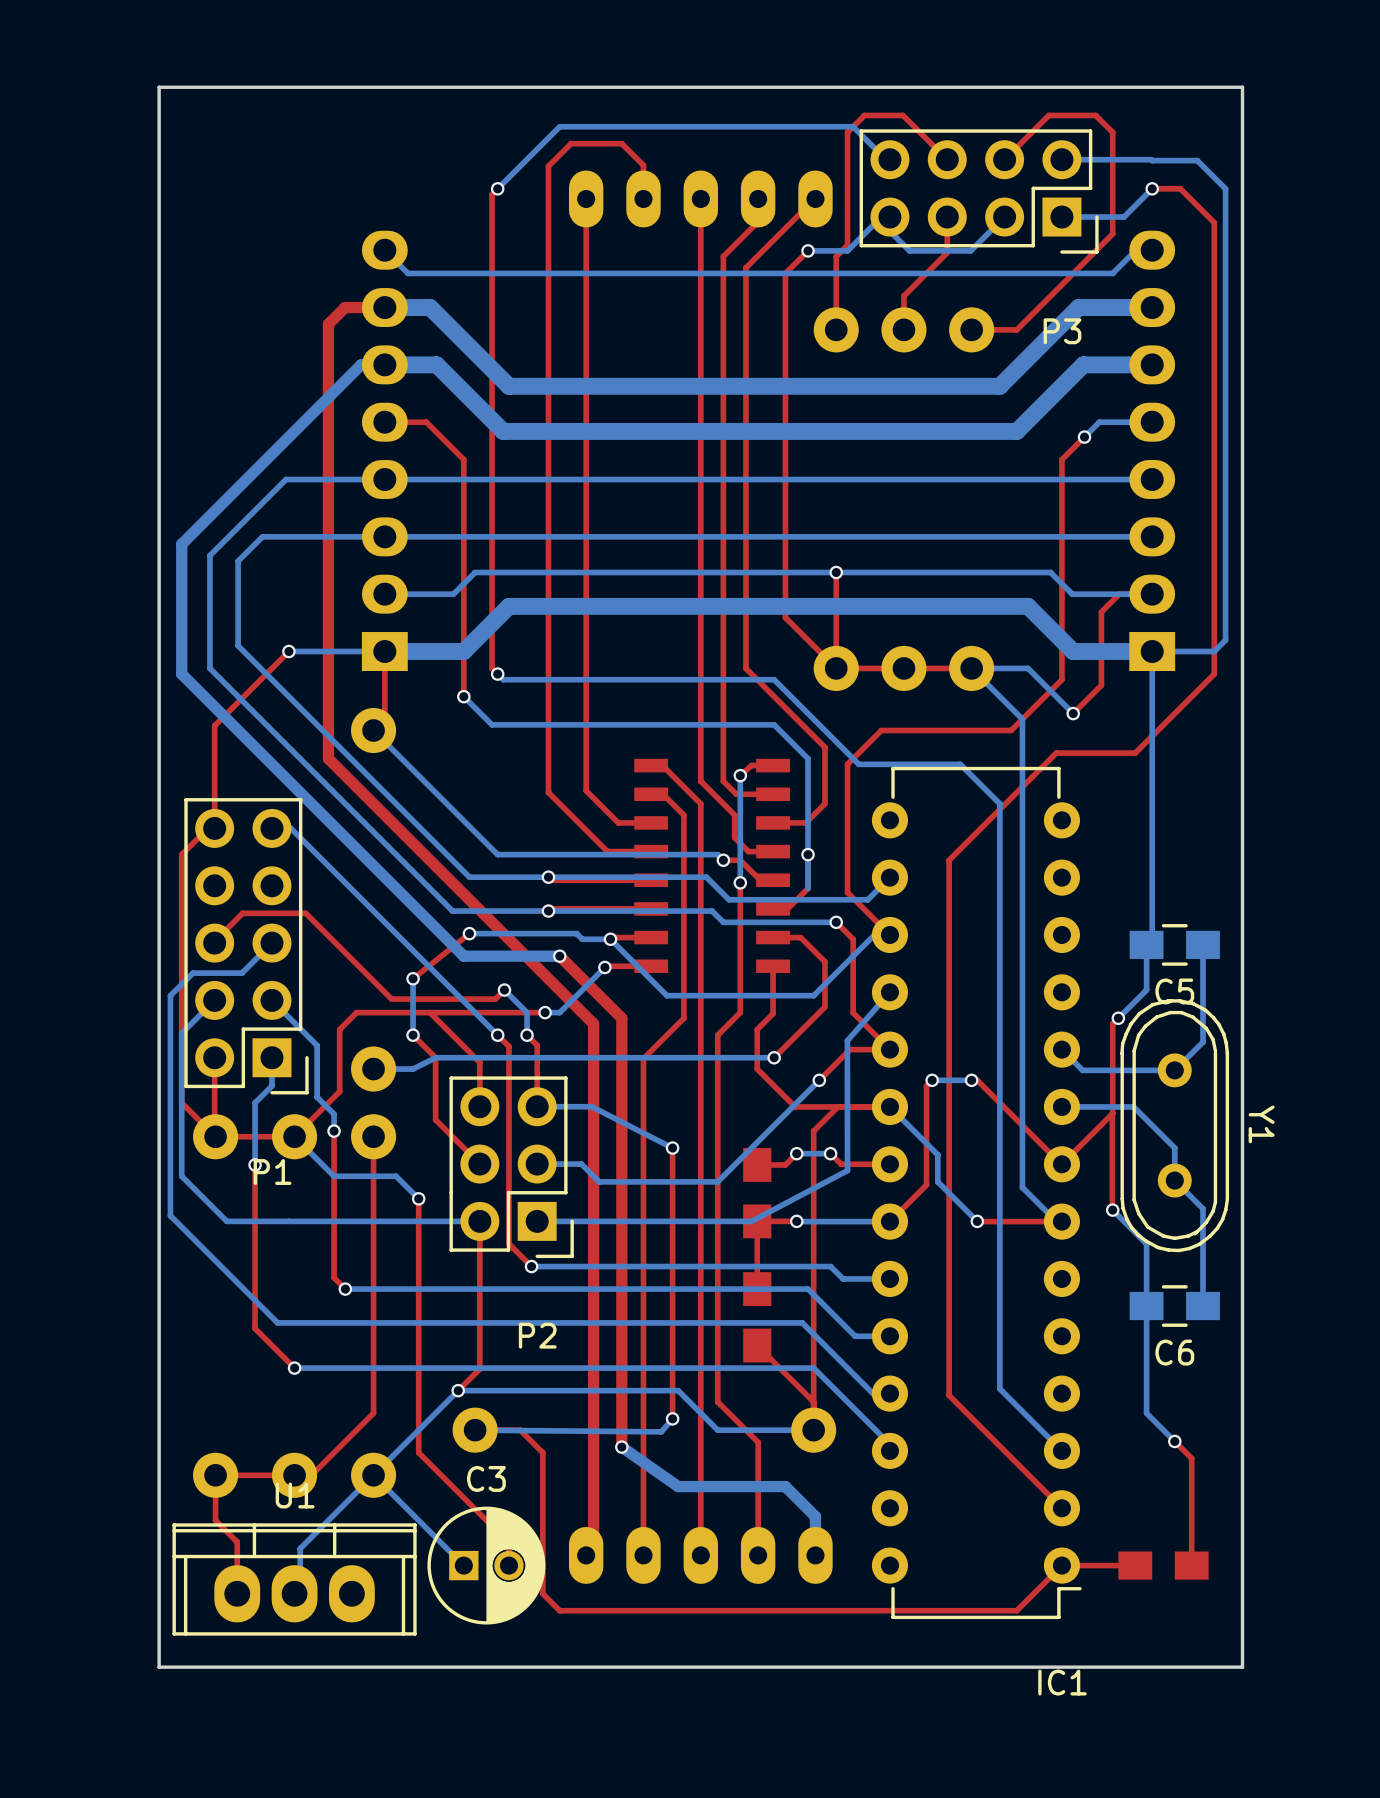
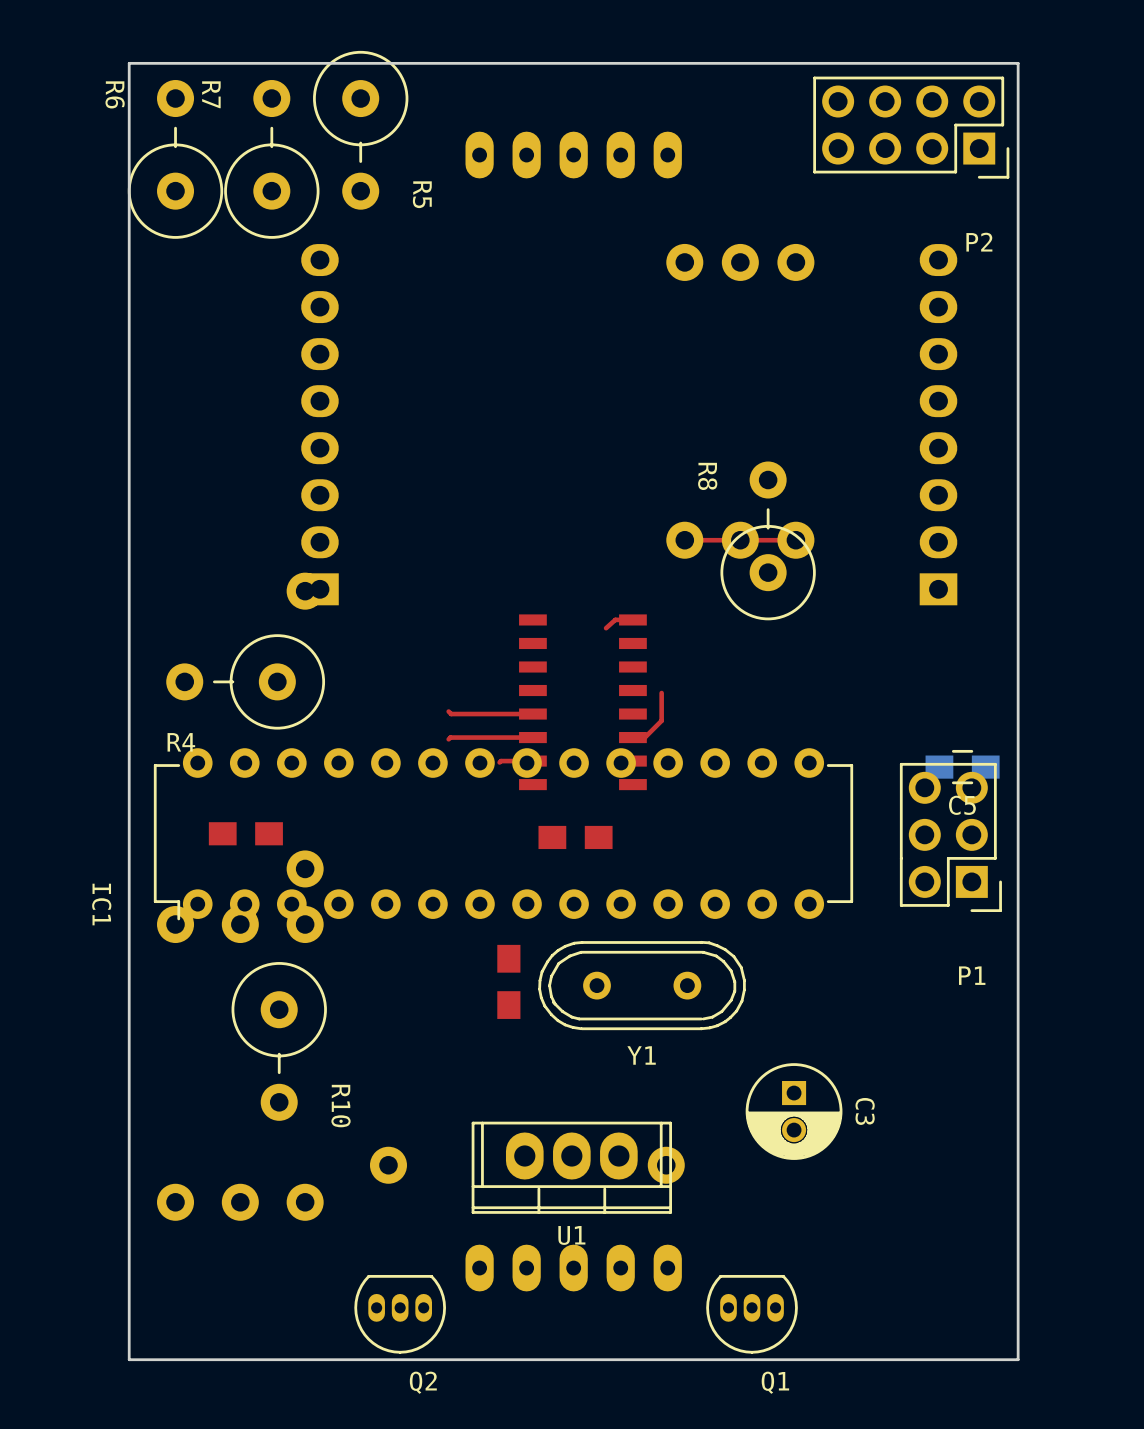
bottom track: (889, 159) (886, 159) (853, 126) (559, 126) (497, 188) -> none
top track: (947, 159) (903, 115) (864, 115) (847, 132) (847, 245) (836, 256) (836, 329) -> none
top track: (1004, 159) (1048, 115) (1095, 115) (1112, 132) (1112, 233) (1016, 329) (971, 329) -> none
bottom track: (1061, 159) (1197, 160) (1225, 188) (1225, 640) (1214, 651) (1152, 651) -> none
R5: none -> (360, 130)
top track: (497, 188) (492, 194) (492, 668) (497, 674) -> none
via: (497, 188) -> none
bottom track: (1152, 188) (1124, 217) (1061, 217) -> none
top track: (1152, 188) (1180, 188) (1214, 222) (1214, 674) (1135, 753) (1056, 753) (949, 860) (949, 1395) (1061, 1508) -> none
via: (1152, 188) -> none
P3: (979, 191) -> none
top track: (586, 198) (586, 790) (618, 822) (651, 822) -> none
top track: (643, 198) (643, 165) (621, 143) (571, 143) (548, 166) (548, 792) (607, 851) (651, 851) -> none
top track: (700, 198) (700, 781) (734, 815) (734, 837) (748, 851) (773, 851) -> none
top track: (758, 198) (758, 221) (723, 256) (723, 781) (736, 794) (773, 794) -> none
top track: (815, 198) (745, 267) (745, 668) (824, 747) (824, 803) (805, 822) (773, 822) -> none
R6: none -> (175, 159)
R7: none -> (271, 159)
top track: (947, 217) (947, 252) (903, 296) (903, 329) -> none
bottom track: (1004, 217) (970, 250) (909, 250) (889, 231) (889, 217) (881, 217) (847, 250) (808, 250) -> none
top track: (808, 250) (785, 273) (785, 617) (836, 668) (836, 572) -> none
via: (808, 250) -> none
bottom track: (1152, 250) (1135, 250) (1112, 273) (408, 273) (384, 250) -> none
top track: (384, 307) (345, 307) (328, 324) (328, 758) (593, 1023) (593, 1547) (586, 1555) -> none
bottom track: (1152, 307) (1078, 307) (999, 386) (508, 386) (430, 307) (384, 307) -> none
bottom track: (1152, 364) (1083, 364) (1016, 431) (503, 431) (436, 364) (361, 364) (181, 544) (181, 674) (463, 956) (559, 956) -> none
top track: (384, 422) (426, 422) (463, 459) (463, 696) -> none
bottom track: (1152, 422) (1099, 422) (1084, 437) -> none
top track: (1084, 437) (1061, 459) (1061, 679) (1011, 730) (881, 730) (847, 764) (847, 892) (889, 934) -> none
via: (1084, 437) -> none
part position: (384, 450) -> (319, 424)
part position: (1152, 450) -> (938, 424)
bottom track: (1152, 479) (285, 479) (209, 555) (209, 668) (452, 911) (712, 911) (723, 922) (836, 922) -> none
bottom track: (1152, 536) (262, 536) (238, 561) (238, 645) (469, 877) (706, 877) (729, 899) (867, 899) (889, 877) -> none
via: (836, 572) -> none
bottom track: (1152, 594) (1072, 594) (1050, 572) (475, 572) (453, 594) (384, 594) -> none
top track: (1152, 594) (1119, 594) (1101, 612) (1101, 685) (1073, 713) -> none
top track: (288, 651) (214, 725) (214, 828) (207, 828) (181, 854) (181, 1102) (215, 1136) (294, 1136) (339, 1091) (339, 1029) (356, 1012) (545, 1012) -> none
via: (288, 651) -> none
top track: (384, 651) (384, 719) (373, 730) -> none
bottom track: (1152, 651) (1073, 651) (1028, 606) (508, 606) (463, 651) (288, 651) -> none
bottom track: (1152, 651) (1152, 939) (1146, 944) (1146, 990) (1118, 1018) -> none
R8: none -> (768, 540)
bottom track: (497, 674) (503, 679) (774, 679) (858, 764) (960, 764) (999, 803) (999, 1388) (1061, 1450) -> none
via: (497, 674) -> none
bottom track: (463, 696) (492, 724) (774, 724) (808, 758) (808, 854) -> none
via: (463, 696) -> none
bottom track: (1073, 713) (1028, 668) (971, 668) (1022, 719) (1022, 1187) (1056, 1221) (1061, 1221) -> none
via: (1073, 713) -> none
bottom track: (373, 730) (497, 854) (717, 854) (723, 860) -> none
top track: (651, 765) (662, 765) (700, 803) (700, 1555) -> none
bottom track: (740, 775) (740, 882) -> none
via: (740, 775) -> none
top track: (651, 794) (666, 798) (683, 815) (683, 1018) (643, 1058) (643, 1555) -> none
P1 footprint: [184, 798, 309, 1095] -> [899, 762, 1002, 913]
bottom track: (271, 828) (290, 828) (497, 1035) -> none
R4: none -> (245, 681)
via: (808, 854) -> none
top track: (723, 860) (740, 860) (760, 880) (773, 880) -> none
via: (723, 860) -> none
bottom track: (808, 860) (808, 888) -> none
via: (548, 877) -> none
top track: (740, 882) (740, 1012) (717, 1035) (717, 1401) (758, 1442) (758, 1555) -> none
via: (740, 882) -> none
via: (548, 911) -> none
top track: (836, 922) (853, 939) (853, 1012) (889, 1049) (850, 1049) (819, 1080) -> none
via: (836, 922) -> none
bottom track: (469, 933) (576, 933) (582, 939) (610, 939) (666, 995) (813, 995) (874, 934) (889, 934) -> none
top track: (469, 933) (413, 978) -> none
via: (469, 933) -> none
top track: (773, 937) (800, 937) (824, 961) (824, 1006) (774, 1057) -> none
via: (610, 939) -> none
top track: (214, 943) (242, 913) (305, 913) (391, 999) (495, 999) (504, 990) -> none
bottom track: (271, 943) (241, 973) (193, 973) (170, 995) (170, 1215) (277, 1322) (802, 1322) (873, 1393) (889, 1393) -> none
bottom track: (1203, 944) (1203, 1042) (1174, 1070) (1082, 1070) (1061, 1049) -> none
top track: (559, 956) (621, 1018) (621, 1447) -> none
via: (559, 956) -> none
top track: (651, 966) (604, 967) -> none
top track: (773, 966) (773, 1013) (757, 1029) (757, 1069) (795, 1106) (889, 1106) -> none
bottom track: (604, 967) (559, 1012) (545, 1012) -> none
via: (604, 967) -> none
bottom track: (413, 978) (413, 1035) -> none
via: (413, 978) -> none
bottom track: (504, 990) (527, 1012) (527, 1035) -> none
via: (504, 990) -> none
bottom track: (884, 992) (889, 992) (847, 1040) (847, 1170) (751, 1221) (537, 1221) -> none
bottom track: (214, 1000) (181, 1033) (181, 1176) (226, 1221) (479, 1221) -> none
bottom track: (271, 1000) (317, 1045) (317, 1097) (334, 1114) (334, 1131) -> none
top track: (429, 1012) (479, 1062) (479, 1106) -> none
via: (545, 1012) -> none
top track: (1118, 1018) (1112, 1023) (1112, 1113) (1061, 1164) (977, 1080) (971, 1080) -> none
via: (1118, 1018) -> none
part: none -> (245, 833)
part: none -> (575, 837)
top track: (413, 1035) (435, 1057) (435, 1119) (479, 1164) -> none
via: (413, 1035) -> none
top track: (497, 1035) (508, 1046) (508, 1243) (531, 1266) -> none
via: (497, 1035) -> none
top track: (527, 1035) (537, 1045) (537, 1106) -> none
via: (527, 1035) -> none
top track: (214, 1057) (214, 1135) -> none
bottom track: (271, 1057) (271, 1085) (255, 1102) (255, 1164) -> none
bottom track: (774, 1057) (435, 1057) (413, 1069) (373, 1069) -> none
via: (774, 1057) -> none
P2 footprint: [449, 1076, 574, 1259] -> [813, 76, 1010, 179]
bottom track: (819, 1080) (717, 1181) (599, 1181) (581, 1164) (537, 1164) -> none
via: (819, 1080) -> none
top track: (932, 1080) (926, 1085) (926, 1185) (889, 1221) -> none
via: (932, 1080) -> none
bottom track: (971, 1080) (932, 1080) -> none
via: (971, 1080) -> none
bottom track: (537, 1106) (591, 1106) (672, 1148) -> none
top track: (837, 1106) (813, 1131) (813, 1430) -> none
bottom track: (889, 1106) (937, 1154) (937, 1181) (977, 1221) -> none
bottom track: (1061, 1106) (1133, 1106) (1174, 1148) (1174, 1180) (1203, 1208) (1203, 1306) -> none
top track: (1112, 1113) (1112, 1210) -> none
Y1 rotation: 0° (1174, 1125) -> 90° clockwise (642, 985)
Y1 position: (1174, 1125) -> (642, 985)
top track: (334, 1131) (334, 1277) (345, 1289) -> none
via: (334, 1131) -> none
bottom track: (294, 1136) (334, 1176) (396, 1176) (418, 1198) -> none
top track: (373, 1136) (373, 1413) (311, 1475) (215, 1475) (215, 1520) (237, 1542) (237, 1593) -> none
top track: (672, 1148) (672, 1418) -> none
via: (672, 1148) -> none
top track: (796, 1153) (785, 1164) (757, 1164) -> none
via: (796, 1153) -> none
bottom track: (830, 1153) (796, 1153) -> none
top track: (830, 1153) (841, 1164) (889, 1164) -> none
via: (830, 1153) -> none
top track: (255, 1164) (255, 1328) (294, 1368) -> none
via: (255, 1164) -> none
P1 name position: P1 (272, 1172) -> P1 (972, 975)
IC1 rotation: 0° (976, 1192) -> 90° clockwise (503, 834)
part: (757, 1193) -> none
top track: (418, 1198) (418, 1452) (508, 1543) (508, 1565) -> none
via: (418, 1198) -> none
bottom track: (1112, 1210) (1146, 1243) (1146, 1413) (1174, 1441) -> none
via: (1112, 1210) -> none
top track: (479, 1221) (479, 1369) (458, 1390) -> none
top track: (796, 1221) (757, 1221) (757, 1289) -> none
via: (796, 1221) -> none
bottom track: (889, 1221) (796, 1221) -> none
via: (977, 1221) -> none
top track: (1061, 1221) (977, 1221) -> none
bottom track: (531, 1266) (830, 1266) (843, 1278) (889, 1278) -> none
via: (531, 1266) -> none
R10: none -> (279, 1041)
bottom track: (345, 1289) (808, 1289) (855, 1336) (889, 1336) -> none
via: (345, 1289) -> none
C6 side: bottom (1174, 1306) -> top (508, 981)
part: (757, 1317) -> none
P2 name position: P2 (537, 1335) -> P2 (979, 242)
top track: (757, 1345) (813, 1401) -> none
bottom track: (294, 1368) (813, 1368) (889, 1444) (889, 1450) -> none
via: (294, 1368) -> none
via: (458, 1390) -> none
bottom track: (672, 1418) (661, 1431) (475, 1430) -> none
via: (672, 1418) -> none
top track: (475, 1430) (520, 1430) (542, 1452) (542, 1593) (559, 1610) (1016, 1610) (1061, 1565) (1135, 1565) -> none
bottom track: (813, 1430) (717, 1430) (678, 1390) (458, 1390) (300, 1548) (300, 1588) (294, 1593) -> none
top track: (1174, 1441) (1191, 1458) (1191, 1565) -> none
via: (1174, 1441) -> none
bottom track: (621, 1447) (678, 1486) (785, 1486) (815, 1516) (815, 1555) -> none
via: (621, 1447) -> none
bottom track: (373, 1475) (463, 1565) -> none
C3 rotation: 0° (486, 1565) -> 90° clockwise (794, 1111)
C3 position: (486, 1565) -> (794, 1111)
part: (1163, 1565) -> none
U1 rotation: 0° (294, 1579) -> 180° (571, 1167)
U1 position: (294, 1579) -> (571, 1167)
Q2: none -> (400, 1314)
Q1: none -> (752, 1314)

